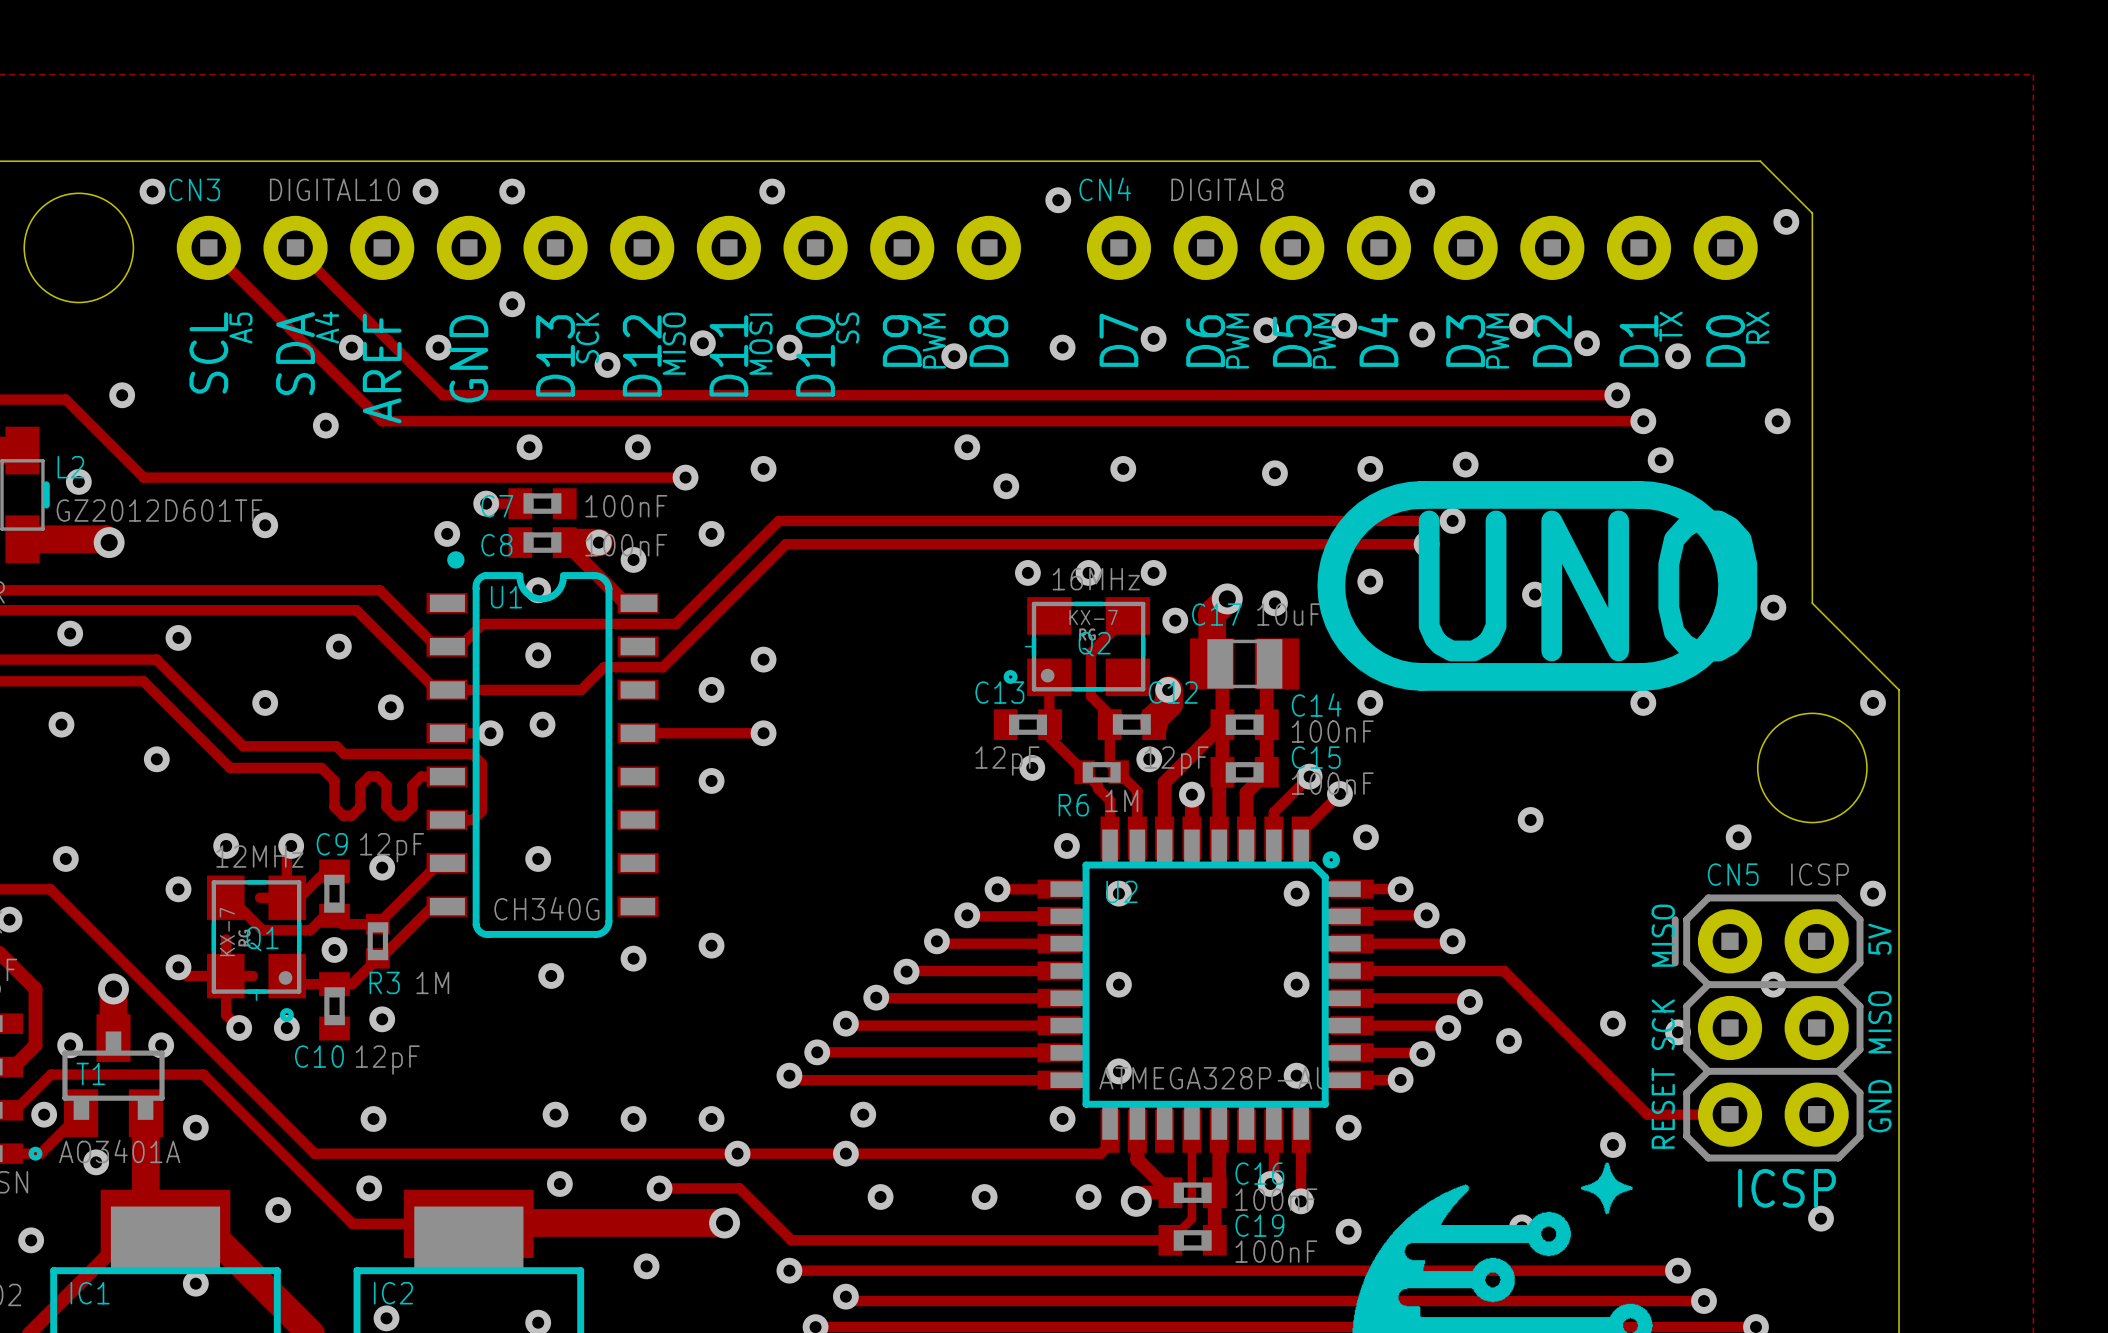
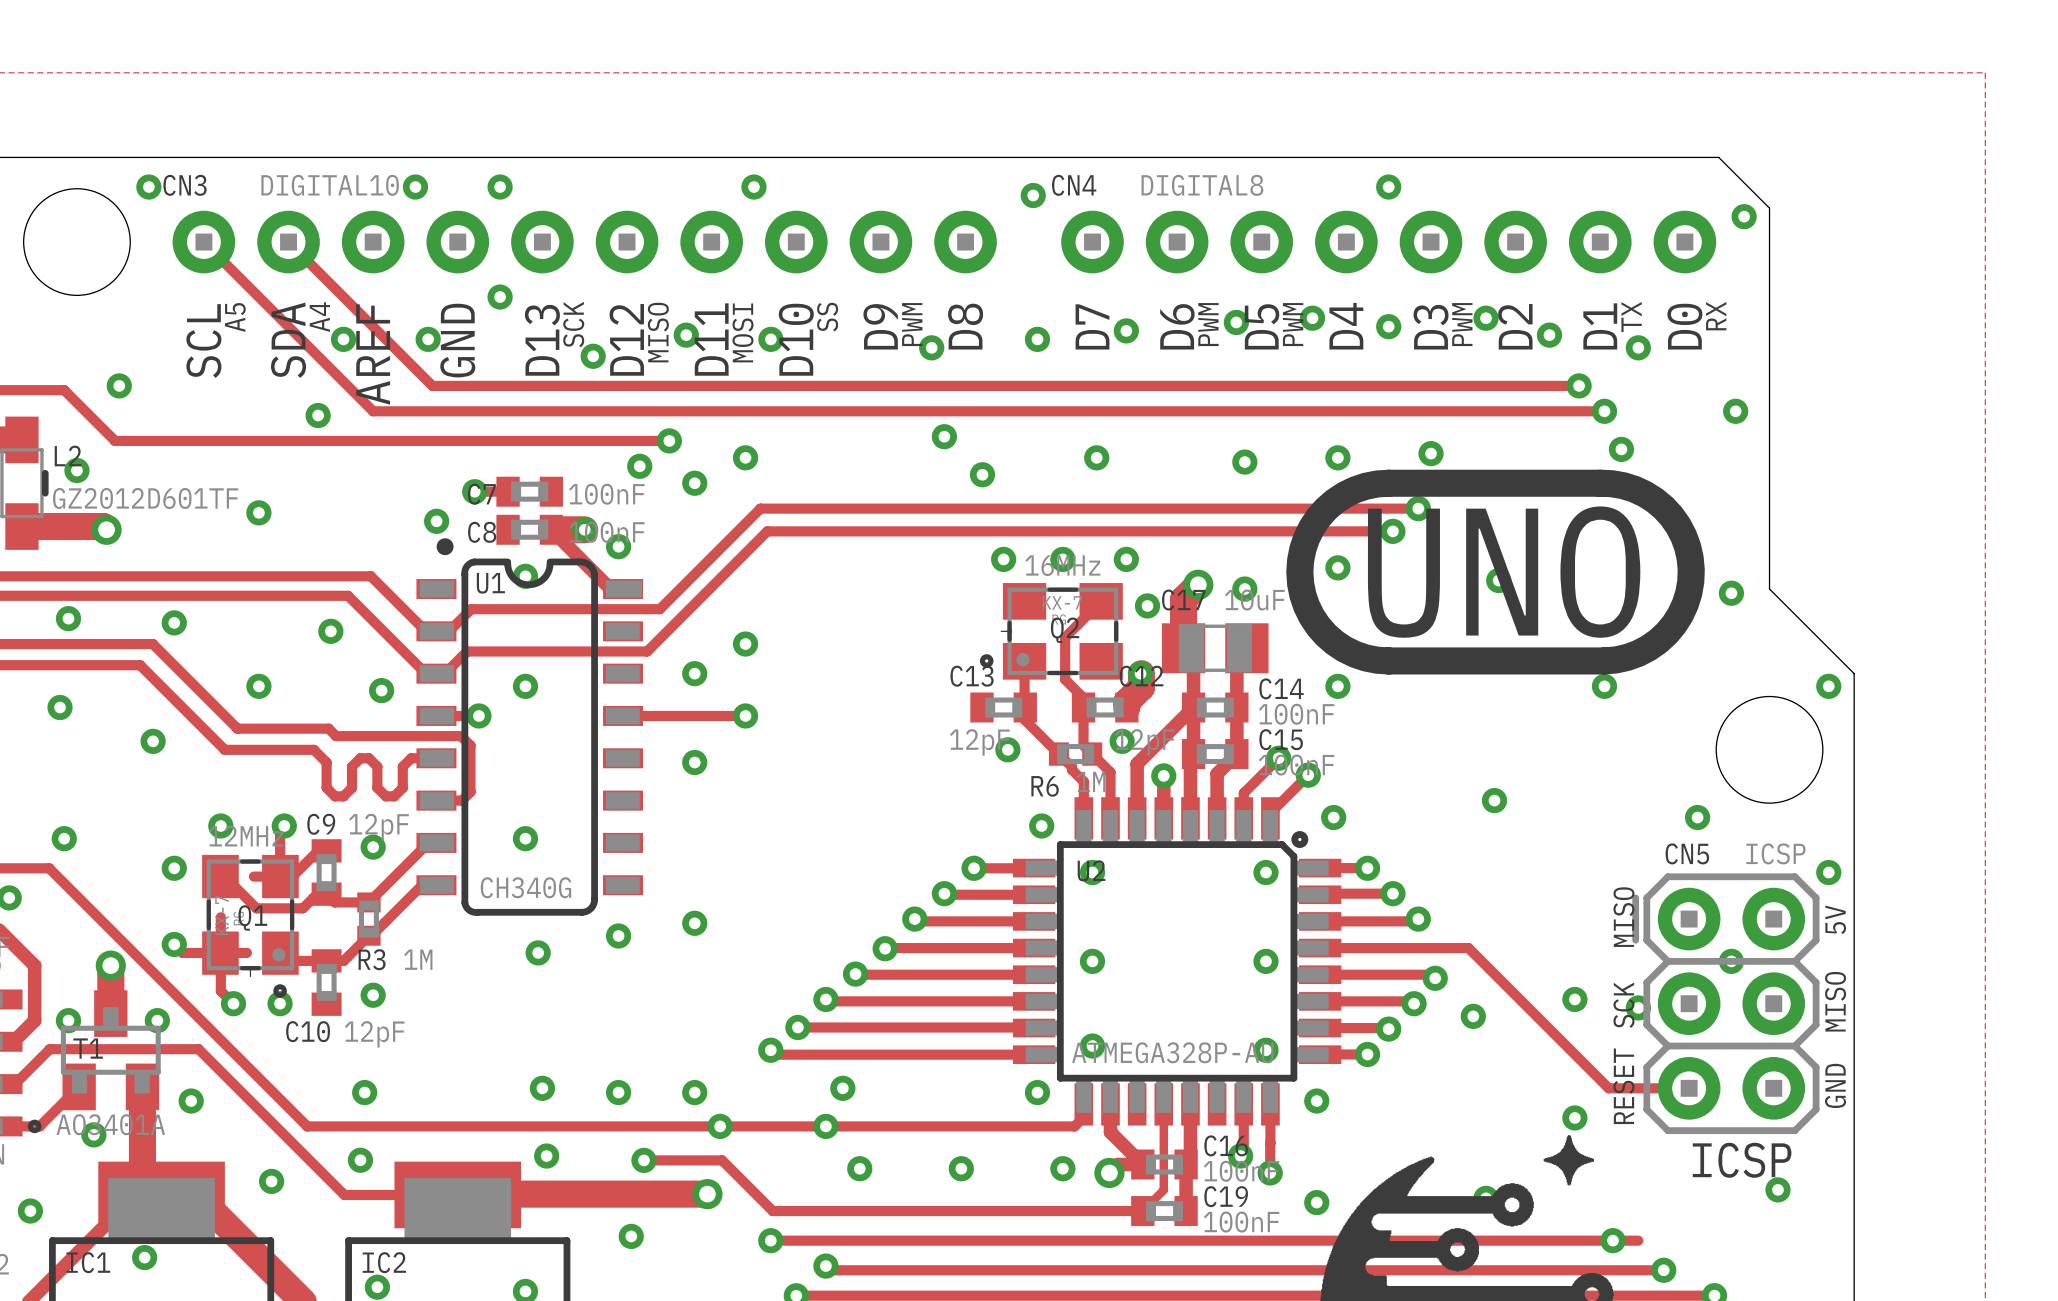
via: (529, 447) -> none
via: (637, 447) -> none
track: (117, 451) (143, 477) (685, 477) -> (115, 440) (669, 440)
via: none -> (669, 440)
via: none -> (639, 466)
via: (685, 477) -> none
via: none -> (694, 483)
via: (711, 533) -> none
via: (538, 655) -> none
track: (604, 667) (581, 689) (455, 689) -> (589, 651) (467, 651) (444, 673)
via position: (542, 724) -> (525, 686)
via: (334, 949) -> none
via: (44, 1114) -> none
via position: (1677, 1270) -> (1612, 1240)
via: (195, 1283) -> none
via: none -> (144, 1257)

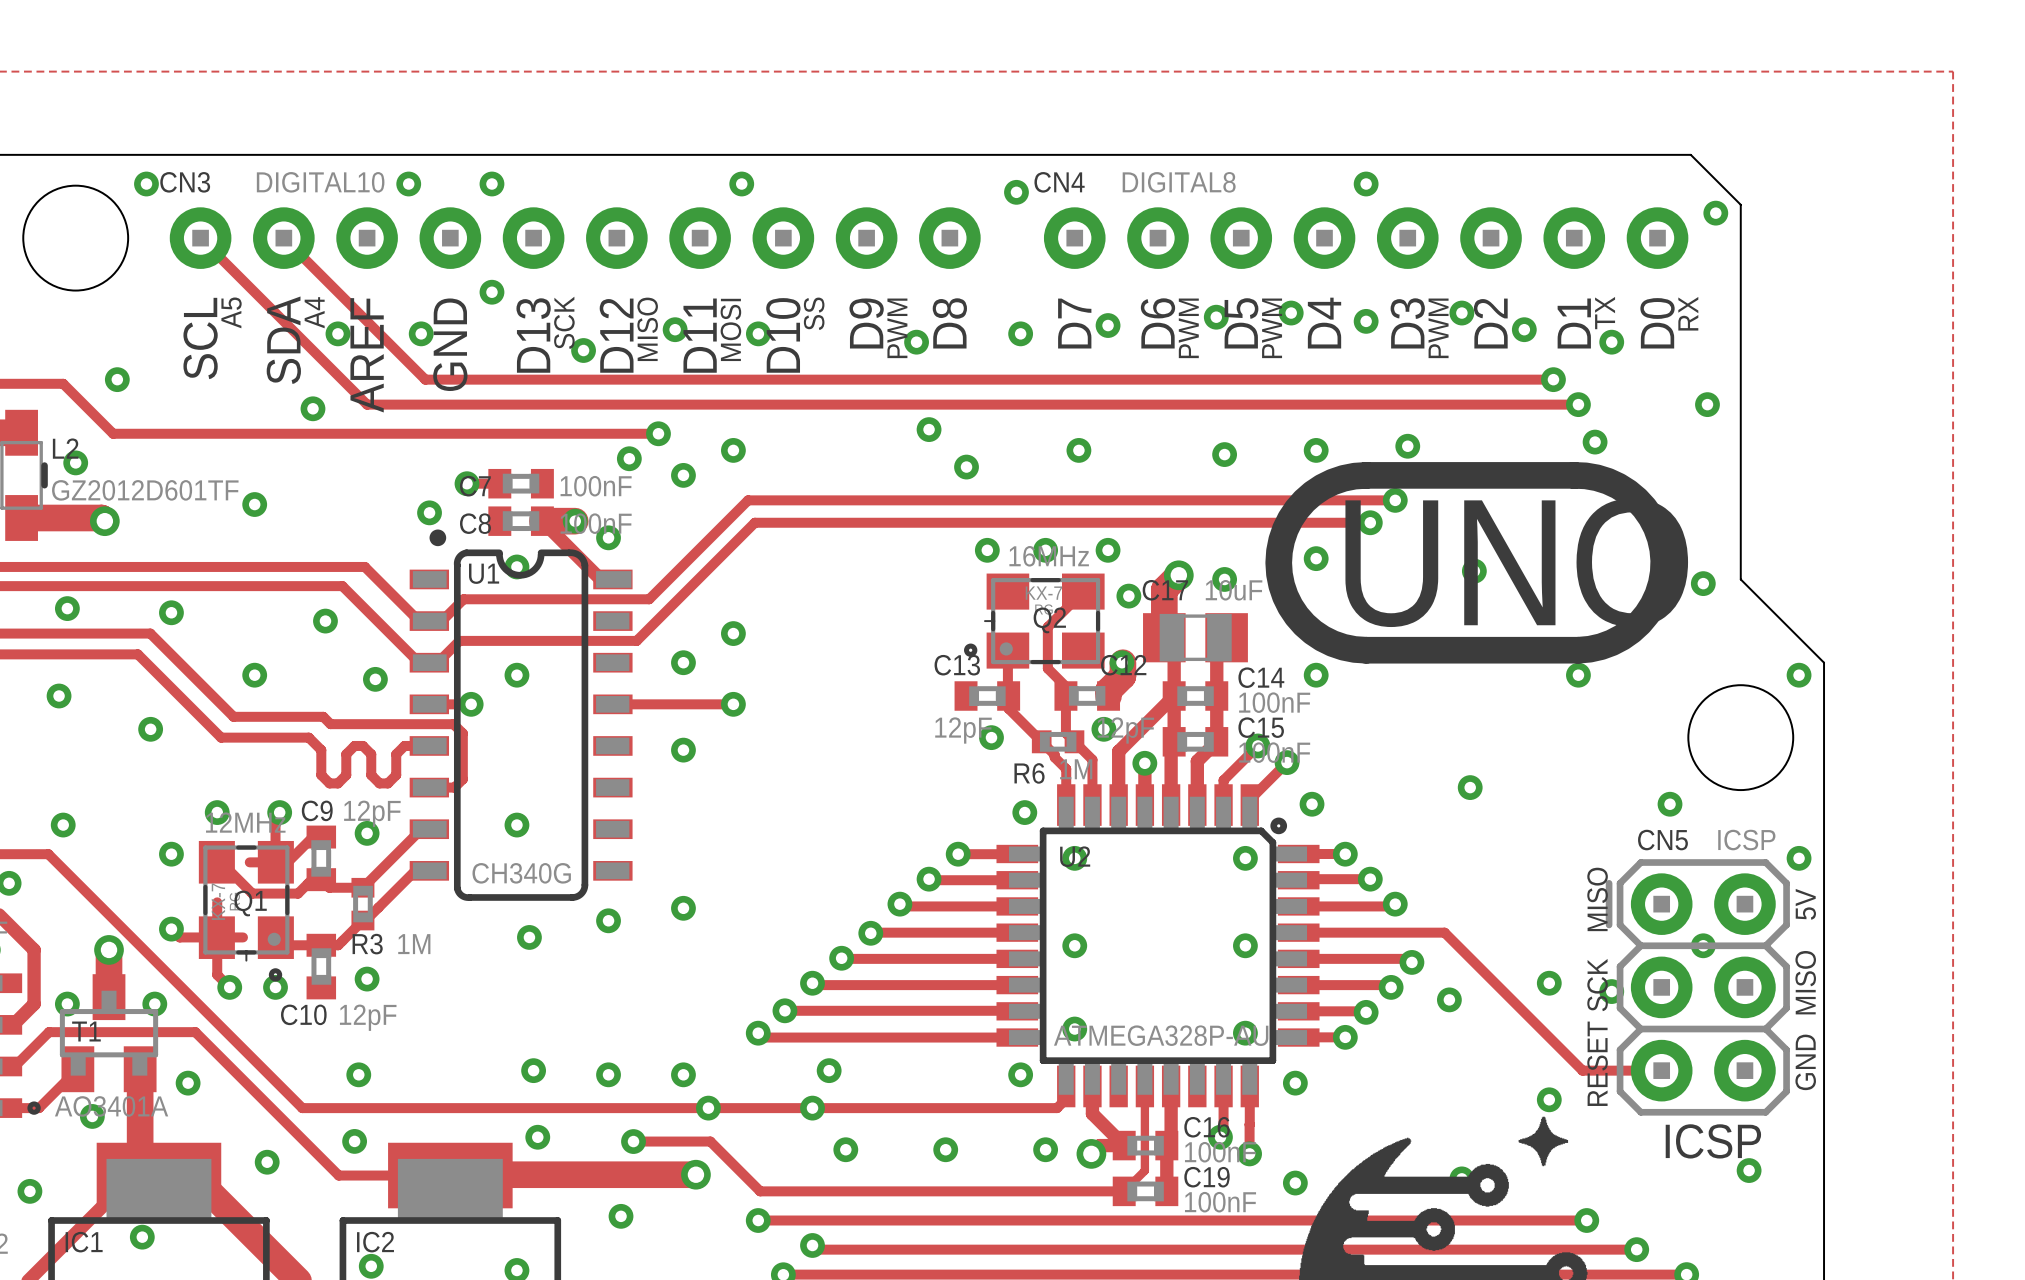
track: (1612, 1240) (1638, 1240) -> none

